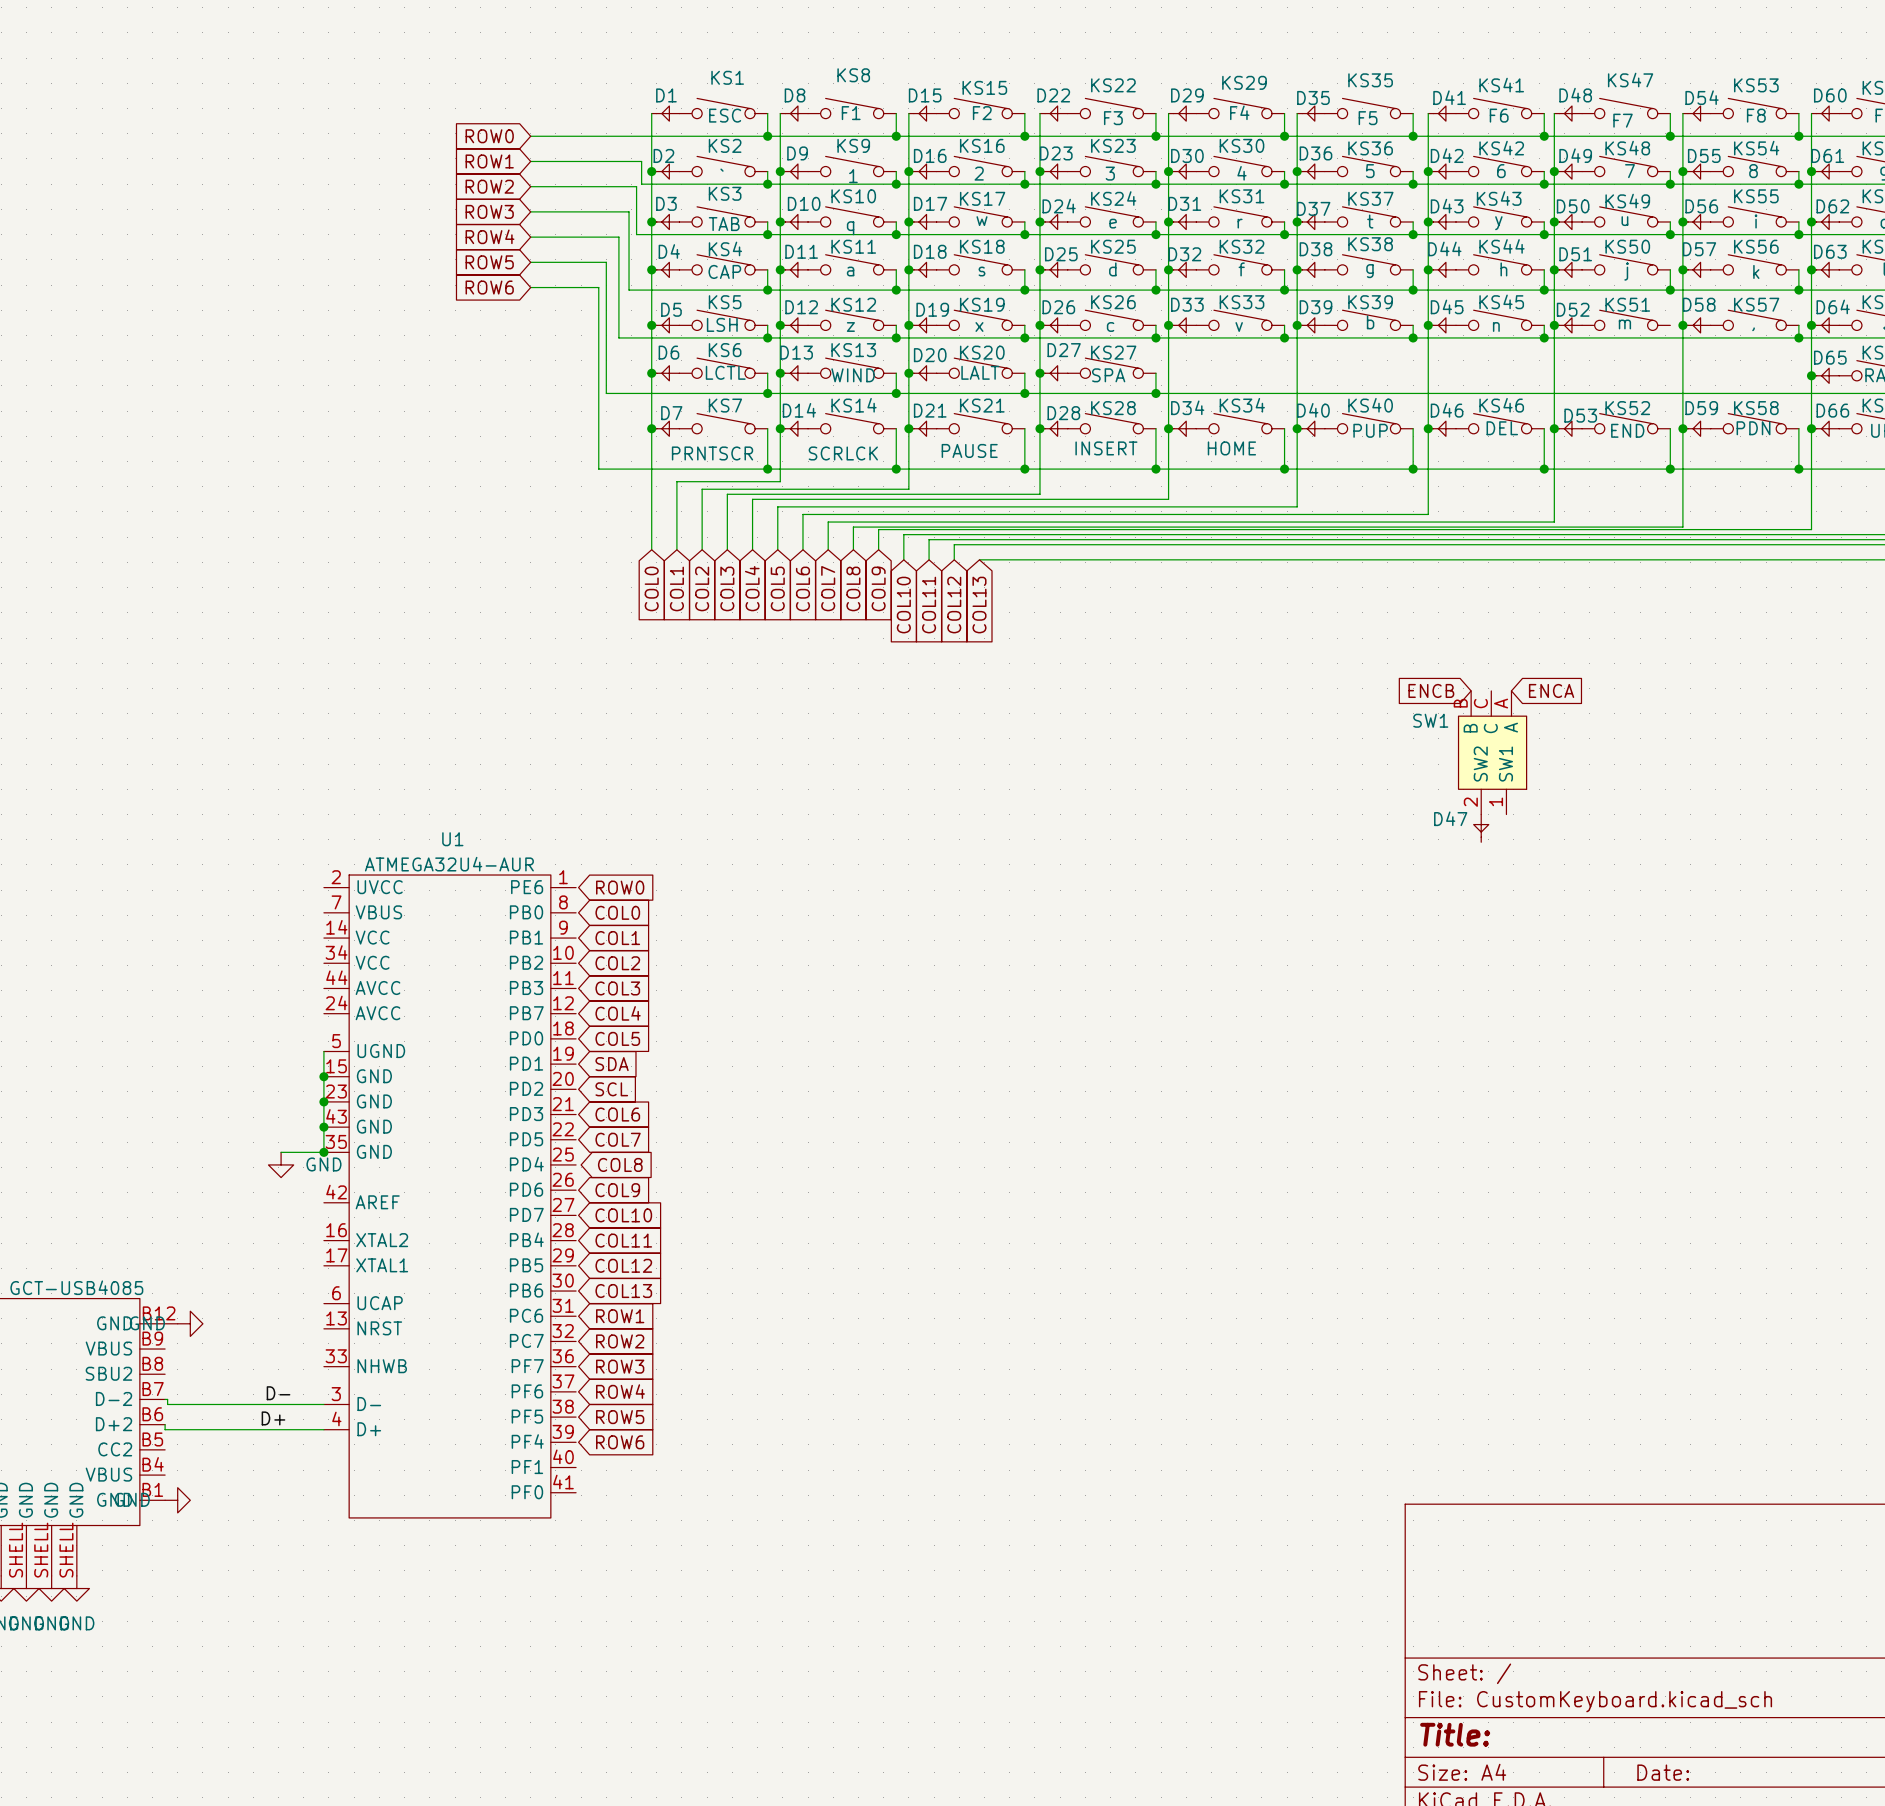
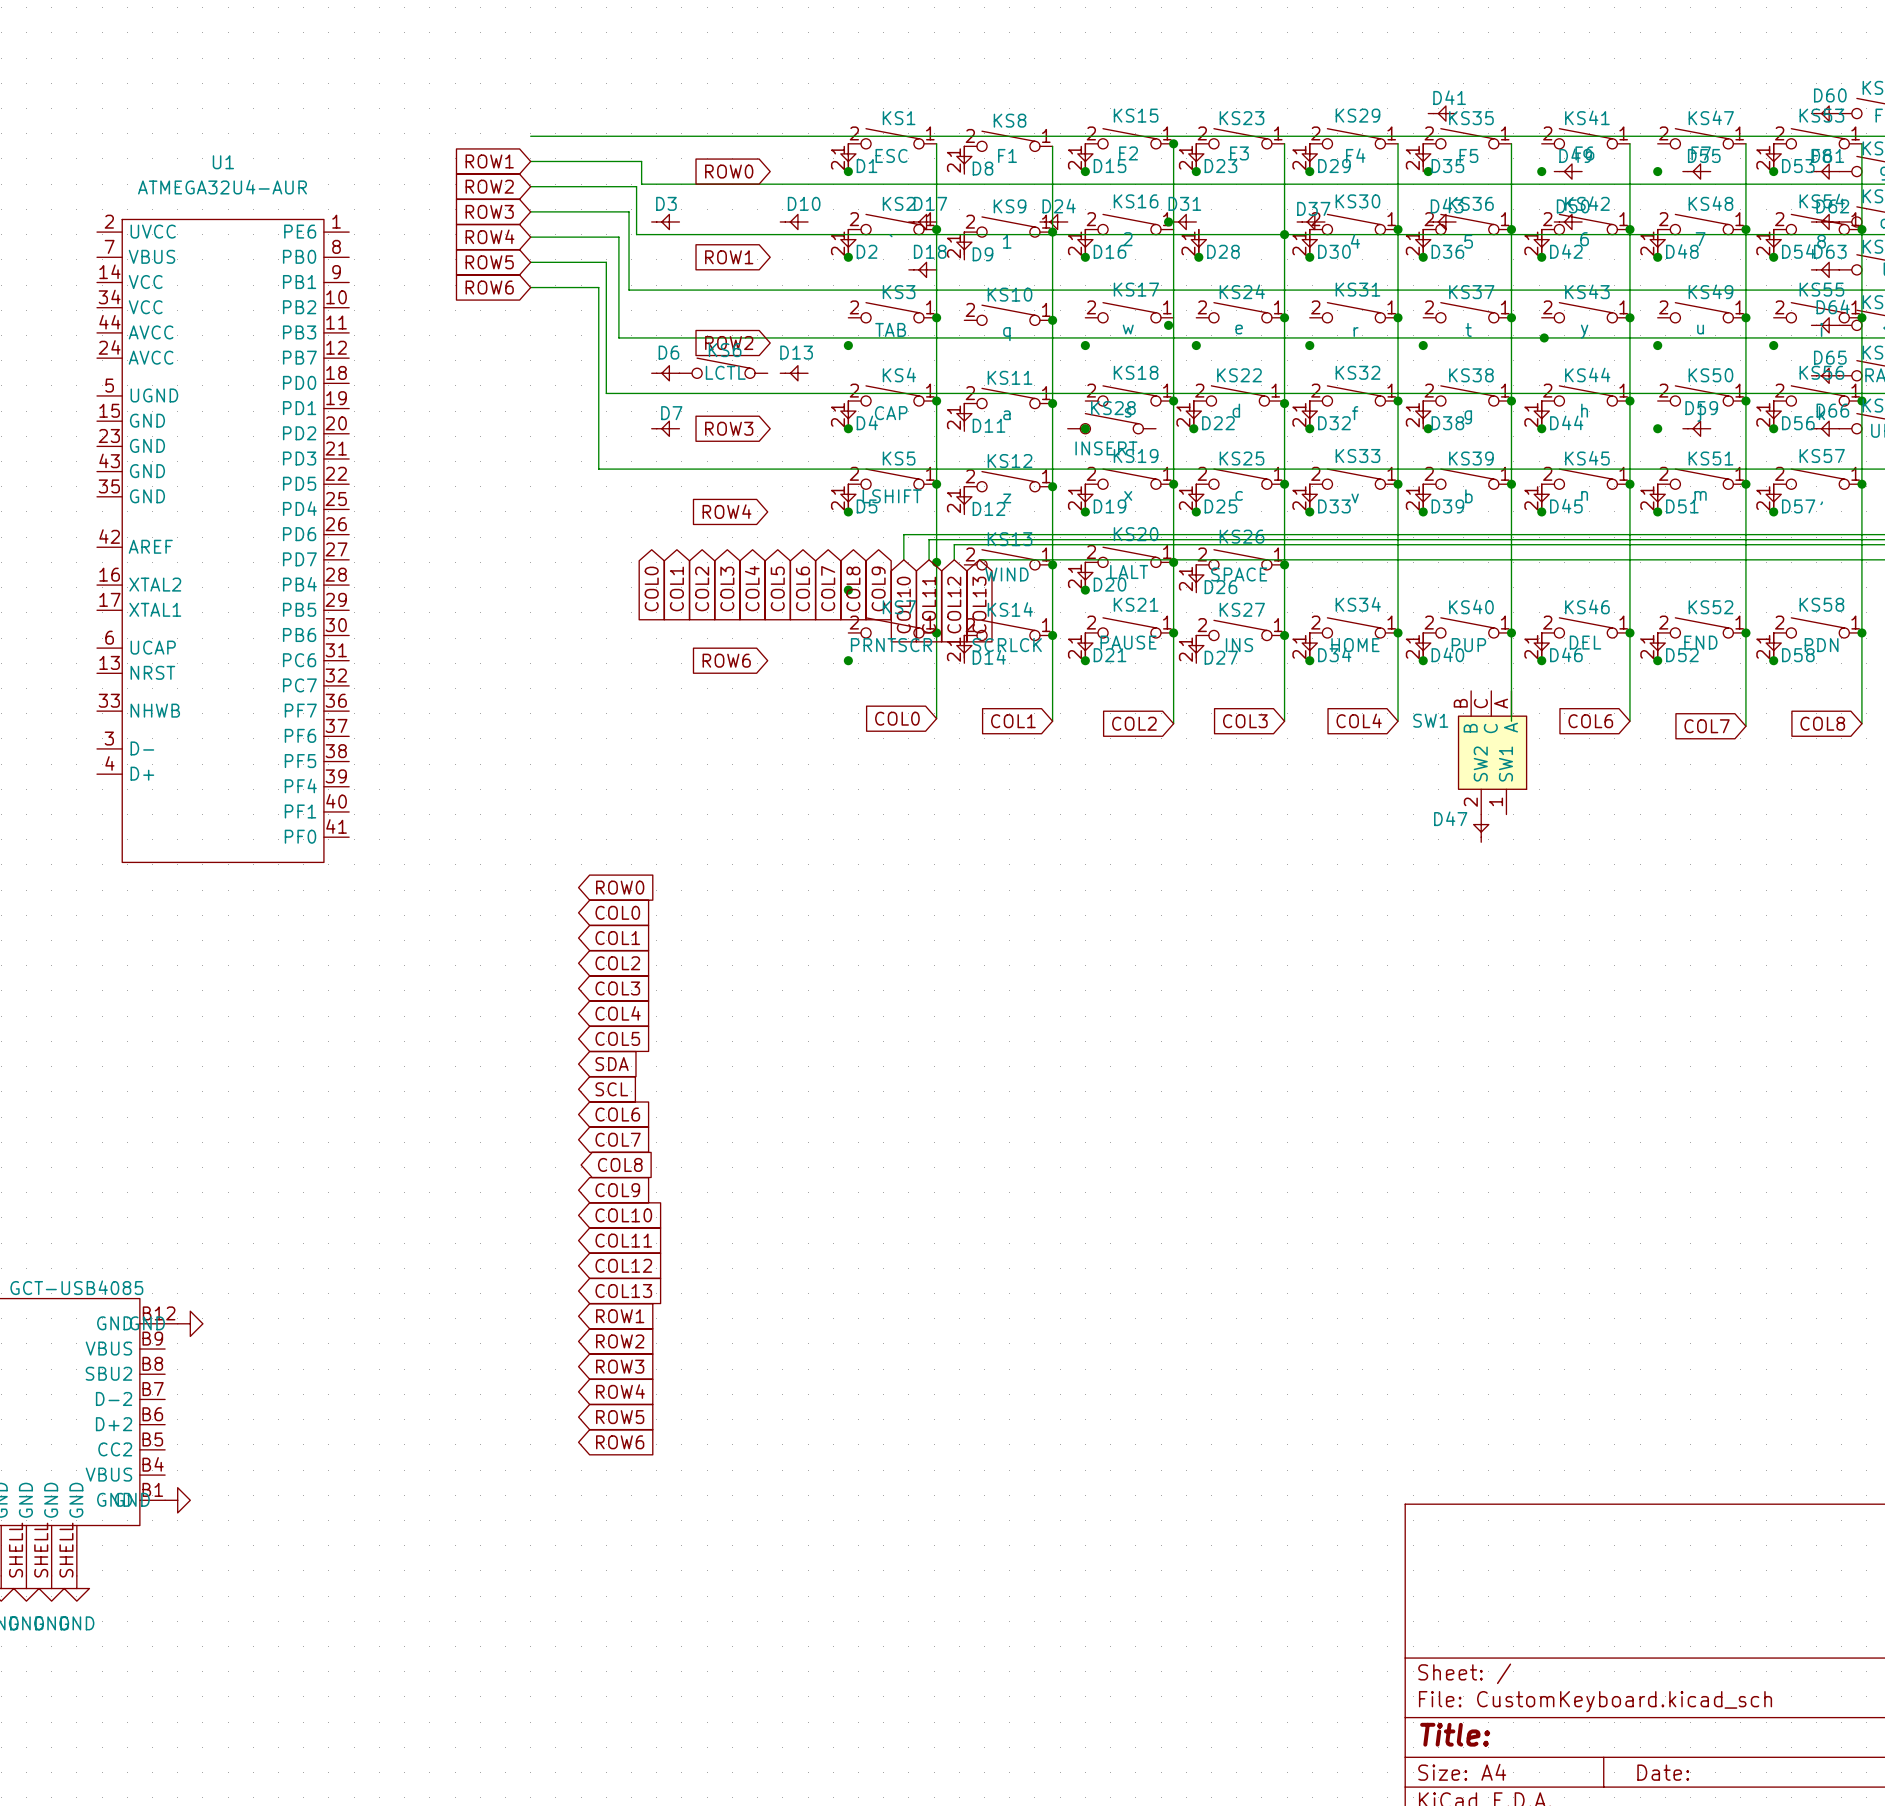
D1 name position: D1 (666, 95) -> D1 (867, 166)
D8 name position: D8 (795, 95) -> D8 (982, 168)
D15 name position: D15 (925, 95) -> D15 (1110, 166)
D22 name position: D22 (1053, 95) -> D22 (1218, 423)
D29 name position: D29 (1187, 95) -> D29 (1334, 166)
D48 name position: D48 (1575, 95) -> D48 (1682, 251)
D35 name position: D35 (1313, 97) -> D35 (1447, 166)
D54 name position: D54 (1702, 97) -> D54 (1798, 251)
KS1 symbol: [679, 98, 768, 119] -> [848, 128, 937, 149]
KS8 symbol: [808, 98, 897, 119] -> [964, 131, 1053, 152]
KS15 symbol: [936, 98, 1025, 119] -> [1085, 128, 1174, 149]
KS22 symbol: [1067, 98, 1156, 119] -> [1193, 385, 1283, 407]
KS29 symbol: [1196, 98, 1285, 119] -> [1309, 128, 1399, 149]
KS35 symbol: [1324, 98, 1414, 119] -> [1423, 128, 1512, 149]
KS41 symbol: [1456, 98, 1545, 119] -> [1541, 128, 1630, 149]
KS47 symbol: [1582, 98, 1671, 119] -> [1657, 128, 1746, 149]
KS53 symbol: [1710, 98, 1799, 119] -> [1773, 128, 1862, 149]
D1 symbol: [651, 106, 680, 122] -> [840, 143, 856, 172]
D8 symbol: [780, 106, 809, 122] -> [956, 146, 972, 175]
D15 symbol: [908, 106, 937, 122] -> [1077, 143, 1093, 172]
D22 symbol: [1039, 106, 1068, 122] -> [1186, 401, 1202, 429]
D29 symbol: [1168, 106, 1197, 122] -> [1302, 143, 1318, 172]
D35 symbol: [1297, 106, 1325, 122] -> [1415, 143, 1431, 172]
D48 symbol: [1554, 106, 1583, 122] -> [1650, 229, 1666, 258]
D54 symbol: [1682, 106, 1711, 122] -> [1766, 229, 1782, 258]
wire: (651, 113) (651, 549) -> none
wire: (767, 113) (767, 136) -> none
wire: (780, 113) (780, 481) (676, 481) (676, 549) -> none
wire: (896, 113) (896, 136) -> none
wire: (908, 113) (908, 489) (702, 489) (702, 549) -> none
wire: (1024, 113) (1024, 136) -> none
wire: (1039, 113) (1039, 494) (727, 494) (727, 549) -> none
wire: (1155, 113) (1155, 136) -> none
wire: (1168, 113) (1168, 499) (752, 499) (752, 549) -> none
wire: (1284, 113) (1284, 136) -> none
wire: (1297, 113) (1297, 506) (777, 506) (777, 549) -> none
wire: (1413, 113) (1413, 136) -> none
wire: (1428, 113) (1428, 514) (802, 514) (802, 549) -> none
wire: (1544, 113) (1544, 136) -> none
wire: (1554, 113) (1554, 522) (828, 522) (828, 549) -> none
wire: (1670, 113) (1670, 136) -> none
wire: (1682, 113) (1682, 527) (853, 527) (853, 549) -> none
wire: (1798, 113) (1798, 136) -> none
wire: (1811, 113) (1811, 529) (878, 529) (878, 549) -> none
KS22 value: F3 (1113, 118) -> d (1236, 410)
global label position: ROW0 (489, 136) -> ROW0 (729, 171)
junction: (767, 136) -> none
junction: (896, 136) -> none
junction: (1024, 136) -> none
junction: (1155, 136) -> none
junction: (1284, 136) -> none
junction: (1413, 136) -> none
junction: (1544, 136) -> none
junction: (1670, 136) -> none
junction: (1798, 136) -> none
wire: none -> (1173, 141) (1173, 723)
wire: none -> (936, 143) (936, 718)
junction: none -> (1173, 143)
wire: none -> (1284, 143) (1284, 171)
wire: none -> (1398, 143) (1398, 721)
wire: none -> (1511, 143) (1511, 721)
wire: none -> (1629, 143) (1629, 721)
wire: none -> (1745, 143) (1745, 726)
wire: none -> (1861, 143) (1861, 723)
wire: none -> (1052, 146) (1052, 721)
D9 name position: D9 (797, 153) -> D9 (982, 254)
D23 name position: D23 (1056, 153) -> D23 (1220, 166)
D36 name position: D36 (1315, 153) -> D36 (1447, 251)
D2 name position: D2 (663, 155) -> D2 (867, 251)
D16 name position: D16 (930, 155) -> D16 (1110, 251)
D30 name position: D30 (1187, 155) -> D30 (1334, 251)
D42 name position: D42 (1447, 155) -> D42 (1566, 251)
KS2 symbol: [679, 156, 768, 177] -> [848, 214, 937, 235]
KS9 symbol: [808, 156, 897, 177] -> [964, 216, 1053, 238]
KS16 symbol: [936, 156, 1025, 177] -> [1085, 214, 1174, 235]
KS23 symbol: [1067, 156, 1156, 177] -> [1196, 128, 1285, 149]
KS30 symbol: [1196, 156, 1285, 177] -> [1309, 214, 1399, 235]
KS36 symbol: [1324, 156, 1414, 177] -> [1423, 214, 1512, 235]
KS42 symbol: [1456, 156, 1545, 177] -> [1541, 214, 1630, 235]
KS48 symbol: [1582, 156, 1671, 177] -> [1657, 214, 1746, 235]
KS54 symbol: [1710, 156, 1799, 177] -> [1773, 214, 1862, 235]
D2 symbol: [651, 164, 680, 180] -> [840, 229, 856, 258]
D9 symbol: [780, 164, 809, 180] -> [956, 232, 972, 260]
D16 symbol: [908, 164, 937, 180] -> [1077, 229, 1093, 258]
D23 symbol: [1039, 164, 1068, 180] -> [1188, 143, 1204, 172]
D30 symbol: [1168, 164, 1197, 180] -> [1302, 229, 1318, 258]
D36 symbol: [1297, 164, 1325, 180] -> [1415, 229, 1431, 258]
D42 symbol: [1428, 164, 1457, 180] -> [1534, 229, 1550, 258]
junction: (651, 171) -> none
wire: (767, 171) (767, 184) -> none
junction: (780, 171) -> none
junction: none -> (848, 171)
wire: (896, 171) (896, 184) -> none
junction: (908, 171) -> none
wire: (1024, 171) (1024, 184) -> none
junction: (1039, 171) -> none
junction: none -> (1085, 171)
wire: (1155, 171) (1155, 184) -> none
junction: (1168, 171) -> none
junction: none -> (1196, 171)
junction position: (1297, 171) -> (1309, 171)
wire: (1413, 171) (1413, 184) -> none
junction: none -> (1541, 171)
wire: (1544, 171) (1544, 184) -> none
junction: (1554, 171) -> none
junction: none -> (1657, 171)
wire: (1670, 171) (1670, 184) -> none
junction: (1682, 171) -> none
junction: none -> (1773, 171)
wire: (1798, 171) (1798, 184) -> none
junction: (1811, 171) -> none
KS23 value: 3 (1110, 173) -> F3 (1239, 153)
junction: (767, 184) -> none
junction: (896, 184) -> none
junction: (1024, 184) -> none
junction: (1155, 184) -> none
wire: none -> (1284, 184) (1284, 221)
junction: (1284, 184) -> none
junction: (1413, 184) -> none
junction: (1544, 184) -> none
junction: (1670, 184) -> none
junction: (1798, 184) -> none
KS3 symbol: [679, 206, 768, 228] -> [848, 302, 937, 323]
KS10 symbol: [808, 206, 897, 228] -> [964, 305, 1053, 326]
KS17 symbol: [936, 206, 1025, 228] -> [1085, 302, 1174, 323]
KS24 symbol: [1067, 206, 1156, 228] -> [1196, 302, 1285, 323]
KS31 symbol: [1196, 206, 1285, 228] -> [1309, 302, 1399, 323]
KS37 symbol: [1324, 206, 1414, 228] -> [1423, 302, 1512, 323]
KS43 symbol: [1456, 206, 1545, 228] -> [1541, 302, 1630, 323]
KS49 symbol: [1582, 206, 1671, 228] -> [1657, 302, 1746, 323]
D56 name position: D56 (1701, 206) -> D56 (1798, 423)
KS55 symbol: [1710, 206, 1799, 228] -> [1773, 302, 1862, 323]
D56 symbol: [1682, 214, 1711, 230] -> [1766, 401, 1782, 429]
junction: (651, 221) -> none
wire: (767, 221) (767, 234) -> none
junction: (780, 221) -> none
wire: (896, 221) (896, 234) -> none
junction: (908, 221) -> none
wire: (1024, 221) (1024, 234) -> none
junction: (1039, 221) -> none
wire: (1155, 221) (1155, 234) -> none
junction: (1297, 221) -> none
wire: (1413, 221) (1413, 234) -> none
junction: (1428, 221) -> none
wire: (1544, 221) (1544, 234) -> none
junction: (1554, 221) -> none
wire: (1670, 221) (1670, 234) -> none
junction: (1682, 221) -> none
wire: (1798, 221) (1798, 234) -> none
junction: (1811, 221) -> none
junction: none -> (936, 229)
junction: none -> (1398, 229)
junction: none -> (1511, 229)
junction: none -> (1629, 229)
junction: none -> (1745, 229)
junction: none -> (1861, 229)
junction: none -> (1052, 232)
junction: (767, 234) -> none
junction: (896, 234) -> none
junction: (1024, 234) -> none
junction: (1155, 234) -> none
wire: none -> (1284, 234) (1284, 269)
junction: (1413, 234) -> none
junction: (1544, 234) -> none
junction: (1670, 234) -> none
junction: (1798, 234) -> none
D44 name position: D44 (1444, 248) -> D44 (1566, 422)
D38 name position: D38 (1315, 249) -> D38 (1447, 423)
D57 name position: D57 (1699, 249) -> D57 (1798, 506)
D4 name position: D4 (669, 251) -> D4 (867, 422)
D11 name position: D11 (801, 251) -> D11 (989, 425)
KS4 symbol: [679, 254, 768, 275] -> [848, 385, 937, 407]
KS11 symbol: [808, 254, 897, 275] -> [964, 388, 1053, 409]
KS18 symbol: [936, 254, 1025, 275] -> [1085, 385, 1174, 407]
D25 name position: D25 (1061, 254) -> D25 (1220, 506)
KS25 symbol: [1067, 254, 1156, 275] -> [1196, 469, 1285, 490]
D32 name position: D32 (1184, 254) -> D32 (1334, 423)
KS32 symbol: [1196, 254, 1285, 275] -> [1309, 385, 1399, 407]
KS38 symbol: [1324, 254, 1414, 275] -> [1423, 385, 1512, 407]
KS44 symbol: [1456, 254, 1545, 275] -> [1541, 385, 1630, 407]
D51 name position: D51 (1575, 254) -> D51 (1682, 506)
KS50 symbol: [1582, 254, 1671, 275] -> [1657, 385, 1746, 407]
KS56 symbol: [1710, 254, 1799, 275] -> [1773, 385, 1862, 407]
global label: none -> ROW1 (729, 257)
junction: none -> (848, 257)
junction: none -> (1085, 257)
junction: none -> (1198, 257)
junction: none -> (1423, 257)
junction: none -> (1541, 257)
junction: none -> (1657, 257)
junction: none -> (1773, 257)
D4 symbol: [651, 262, 680, 278] -> [840, 401, 856, 429]
D11 symbol: [780, 262, 809, 278] -> [956, 403, 972, 432]
D25 symbol: [1039, 262, 1068, 278] -> [1188, 484, 1204, 512]
D32 symbol: [1168, 262, 1197, 278] -> [1302, 401, 1318, 429]
D38 symbol: [1297, 262, 1325, 278] -> [1415, 401, 1431, 429]
D44 symbol: [1428, 262, 1457, 278] -> [1534, 401, 1550, 429]
D51 symbol: [1554, 262, 1583, 278] -> [1650, 484, 1666, 512]
D57 symbol: [1682, 262, 1711, 278] -> [1766, 484, 1782, 512]
junction: (651, 269) -> none
wire: (767, 269) (767, 290) -> none
junction: (780, 269) -> none
wire: (896, 269) (896, 290) -> none
junction: (908, 269) -> none
wire: (1024, 269) (1024, 290) -> none
junction: (1039, 269) -> none
KS25 value: d (1112, 269) -> c (1239, 495)
wire: (1155, 269) (1155, 290) -> none
junction: (1168, 269) -> none
junction position: (1297, 269) -> (1309, 257)
wire: (1413, 269) (1413, 290) -> none
junction: (1428, 269) -> none
wire: (1544, 269) (1544, 290) -> none
junction: (1554, 269) -> none
wire: (1670, 269) (1670, 290) -> none
junction: (1682, 269) -> none
wire: (1798, 269) (1798, 290) -> none
junction: (1811, 269) -> none
junction: (767, 290) -> none
junction: (896, 290) -> none
junction: (1024, 290) -> none
junction: (1155, 290) -> none
wire: none -> (1284, 290) (1284, 325)
junction: (1284, 290) -> none
junction: (1413, 290) -> none
junction: (1544, 290) -> none
junction: (1670, 290) -> none
junction: (1798, 290) -> none
D33 name position: D33 (1187, 304) -> D33 (1334, 506)
D58 name position: D58 (1699, 304) -> D58 (1798, 655)
D45 name position: D45 (1447, 306) -> D45 (1566, 506)
D12 name position: D12 (801, 307) -> D12 (989, 508)
D26 name position: D26 (1058, 307) -> D26 (1220, 587)
D39 name position: D39 (1315, 307) -> D39 (1447, 506)
D5 name position: D5 (671, 309) -> D5 (867, 506)
D19 name position: D19 (932, 309) -> D19 (1110, 506)
D52 name position: D52 (1573, 309) -> D52 (1682, 655)
KS5 symbol: [679, 310, 768, 331] -> [848, 469, 937, 490]
KS12 symbol: [808, 310, 897, 331] -> [964, 471, 1053, 492]
KS19 symbol: [936, 310, 1025, 331] -> [1085, 469, 1174, 490]
KS26 symbol: [1067, 310, 1156, 331] -> [1196, 549, 1285, 570]
KS33 symbol: [1196, 310, 1285, 331] -> [1309, 469, 1399, 490]
KS39 symbol: [1324, 310, 1414, 331] -> [1423, 469, 1512, 490]
KS45 symbol: [1456, 310, 1545, 331] -> [1541, 469, 1630, 490]
KS51 symbol: [1582, 310, 1671, 331] -> [1657, 469, 1746, 490]
KS57 symbol: [1710, 310, 1799, 331] -> [1773, 469, 1862, 490]
D5 symbol: [651, 317, 680, 333] -> [840, 484, 856, 512]
D12 symbol: [780, 317, 809, 333] -> [956, 486, 972, 515]
D19 symbol: [908, 317, 937, 333] -> [1077, 484, 1093, 512]
junction: none -> (936, 317)
D26 symbol: [1039, 317, 1068, 333] -> [1188, 564, 1204, 593]
D33 symbol: [1168, 317, 1197, 333] -> [1302, 484, 1318, 512]
junction: none -> (1284, 317)
D39 symbol: [1297, 317, 1325, 333] -> [1415, 484, 1431, 512]
junction: none -> (1398, 317)
D45 symbol: [1428, 317, 1457, 333] -> [1534, 484, 1550, 512]
junction: none -> (1511, 317)
D52 symbol: [1554, 317, 1583, 333] -> [1650, 632, 1666, 661]
junction: none -> (1629, 317)
D58 symbol: [1682, 317, 1711, 333] -> [1766, 632, 1782, 661]
junction: none -> (1745, 317)
junction: none -> (1861, 317)
KS5 value: LSH (722, 324) -> LSHIFT (892, 496)
junction: (651, 325) -> none
wire: (767, 325) (767, 337) -> none
junction: (780, 325) -> none
wire: (896, 325) (896, 337) -> none
junction: (908, 325) -> none
wire: (1024, 325) (1024, 337) -> none
junction position: (1039, 325) -> (1052, 320)
wire: (1155, 325) (1155, 337) -> none
junction: (1297, 325) -> none
wire: (1413, 325) (1413, 337) -> none
junction: (1428, 325) -> none
wire: (1544, 325) (1544, 337) -> none
junction: (1554, 325) -> none
junction: (1682, 325) -> none
wire: (1798, 325) (1798, 337) -> none
junction: (1811, 325) -> none
KS26 value: c (1110, 326) -> SPACE (1239, 574)
junction: (767, 337) -> none
junction: (896, 337) -> none
junction: (1024, 337) -> none
junction: (1155, 337) -> none
wire: none -> (1284, 337) (1284, 428)
junction: (1284, 337) -> none
junction: (1413, 337) -> none
junction: (1798, 337) -> none
global label: none -> ROW2 (729, 343)
junction: none -> (848, 345)
junction: none -> (1085, 345)
junction: none -> (1196, 345)
junction: none -> (1309, 345)
junction: none -> (1423, 345)
junction: none -> (1657, 345)
junction: none -> (1773, 345)
D27 name position: D27 (1064, 350) -> D27 (1221, 657)
D20 name position: D20 (930, 355) -> D20 (1110, 584)
KS13 symbol: [808, 358, 897, 379] -> [964, 549, 1053, 570]
KS20 symbol: [936, 358, 1025, 379] -> [1085, 547, 1174, 568]
KS27 symbol: [1067, 358, 1156, 379] -> [1196, 620, 1285, 641]
D20 symbol: [908, 365, 937, 381] -> [1077, 562, 1093, 591]
D27 symbol: [1039, 365, 1068, 381] -> [1188, 635, 1204, 664]
junction: (651, 373) -> none
wire: (767, 373) (767, 393) -> none
junction: (780, 373) -> none
wire: (896, 373) (896, 393) -> none
junction: (908, 373) -> none
wire: (1024, 373) (1024, 393) -> none
junction: (1039, 373) -> none
wire: (1155, 373) (1155, 393) -> none
KS27 value: SPA (1108, 375) -> INS (1239, 645)
junction: (1811, 375) -> none
junction: (767, 393) -> none
junction: (896, 393) -> none
junction: (1024, 393) -> none
junction: (1155, 393) -> none
junction: none -> (936, 401)
junction: none -> (1173, 401)
junction: none -> (1398, 401)
junction: none -> (1511, 401)
junction: none -> (1629, 401)
junction: none -> (1745, 401)
junction: none -> (1861, 401)
junction: none -> (1052, 403)
junction: none -> (1284, 403)
D34 name position: D34 (1187, 407) -> D34 (1334, 654)
D14 name position: D14 (799, 410) -> D14 (989, 657)
D21 name position: D21 (930, 410) -> D21 (1110, 655)
D40 name position: D40 (1313, 410) -> D40 (1447, 654)
D46 name position: D46 (1447, 410) -> D46 (1566, 654)
KS7 symbol: [679, 413, 768, 434] -> [848, 617, 937, 639]
KS14 symbol: [808, 413, 897, 434] -> [964, 620, 1053, 641]
KS21 symbol: [936, 413, 1025, 434] -> [1085, 617, 1174, 639]
D28 name position: D28 (1063, 413) -> D28 (1223, 251)
KS34 symbol: [1196, 413, 1285, 434] -> [1309, 617, 1399, 639]
KS40 symbol: [1324, 413, 1414, 434] -> [1423, 617, 1512, 639]
KS46 symbol: [1456, 413, 1545, 434] -> [1541, 617, 1630, 639]
KS52 symbol: [1582, 413, 1671, 434] -> [1657, 617, 1746, 639]
KS58 symbol: [1710, 413, 1799, 434] -> [1773, 617, 1862, 639]
D53 name position: D53 (1580, 415) -> D53 (1798, 166)
D14 symbol: [780, 421, 809, 437] -> [956, 635, 972, 664]
D21 symbol: [908, 421, 937, 437] -> [1077, 632, 1093, 661]
D28 symbol: [1039, 421, 1068, 437] -> [1191, 229, 1207, 258]
D34 symbol: [1168, 421, 1197, 437] -> [1302, 632, 1318, 661]
D40 symbol: [1297, 421, 1325, 437] -> [1415, 632, 1431, 661]
D46 symbol: [1428, 421, 1457, 437] -> [1534, 632, 1550, 661]
D53 symbol: [1554, 421, 1583, 437] -> [1766, 143, 1782, 172]
junction: (651, 428) -> none
global label: none -> ROW3 (729, 428)
wire: (767, 428) (767, 469) -> none
junction: (780, 428) -> none
junction: none -> (848, 428)
wire: (896, 428) (896, 469) -> none
junction: (908, 428) -> none
wire: (1024, 428) (1024, 469) -> none
junction: (1039, 428) -> none
junction: none -> (1085, 428)
wire: (1155, 428) (1155, 469) -> none
junction: (1168, 428) -> none
junction: none -> (1193, 428)
junction position: (1297, 428) -> (1309, 428)
wire: (1413, 428) (1413, 469) -> none
wire: (1544, 428) (1544, 469) -> none
junction position: (1554, 428) -> (1541, 428)
junction: none -> (1657, 428)
wire: (1670, 428) (1670, 469) -> none
junction: (1682, 428) -> none
junction: none -> (1773, 428)
wire: (1798, 428) (1798, 469) -> none
junction: (1811, 428) -> none
junction: (767, 469) -> none
junction: (896, 469) -> none
junction: (1024, 469) -> none
junction position: (1155, 469) -> (1173, 484)
wire: none -> (1284, 469) (1284, 721)
junction position: (1284, 469) -> (1284, 484)
junction position: (1413, 469) -> (1398, 484)
junction: (1544, 469) -> none
junction: (1670, 469) -> none
junction: (1798, 469) -> none
junction: none -> (936, 484)
junction: none -> (1511, 484)
junction: none -> (1629, 484)
junction: none -> (1745, 484)
junction: none -> (1861, 484)
junction: none -> (1052, 486)
global label: none -> ROW4 (726, 511)
junction: none -> (848, 511)
junction: none -> (1085, 511)
junction: none -> (1196, 511)
junction: none -> (1309, 511)
junction: none -> (1423, 511)
junction: none -> (1541, 511)
junction: none -> (1657, 511)
junction: none -> (1773, 511)
junction: none -> (936, 562)
junction: none -> (1173, 562)
junction: none -> (1052, 564)
junction: none -> (1284, 564)
junction: none -> (848, 590)
junction: none -> (1085, 590)
junction: none -> (936, 632)
junction: none -> (1173, 632)
junction: none -> (1398, 632)
junction: none -> (1511, 632)
junction: none -> (1629, 632)
junction: none -> (1745, 632)
junction: none -> (1861, 632)
junction: none -> (1052, 635)
junction: none -> (1284, 635)
global label: none -> ROW6 (726, 660)
junction: none -> (848, 660)
junction: none -> (1085, 660)
junction: none -> (1309, 660)
junction: none -> (1423, 660)
junction: none -> (1541, 660)
junction: none -> (1657, 660)
junction: none -> (1773, 660)
global label: ENCB (1431, 690) -> none
global label: ENCA (1551, 690) -> none
global label: none -> COL0 (897, 718)
global label: none -> COL4 (1359, 720)
global label: none -> COL1 (1013, 721)
global label: none -> COL3 (1245, 721)
global label: none -> COL6 (1590, 721)
global label: none -> COL2 (1134, 723)
global label: none -> COL8 (1822, 723)
global label: none -> COL7 (1707, 726)
U1 name position: U1 (452, 839) -> U1 (223, 162)
U1 value position: ATMEGA32U4-AUR (449, 864) -> ATMEGA32U4-AUR (222, 187)
wire: (323, 1051) (323, 1152) (281, 1152) -> none
junction: (323, 1076) -> none
junction: (323, 1101) -> none
junction: (323, 1127) -> none
junction: (323, 1152) -> none
power symbol: GND (281, 1164) -> none
U1 position: (450, 1196) -> (223, 540)
label: D- (278, 1393) -> none
wire: (165, 1399) (167, 1399) (167, 1404) (323, 1404) -> none
label: D+ (273, 1418) -> none
wire: (165, 1424) (165, 1429) (323, 1429) -> none

